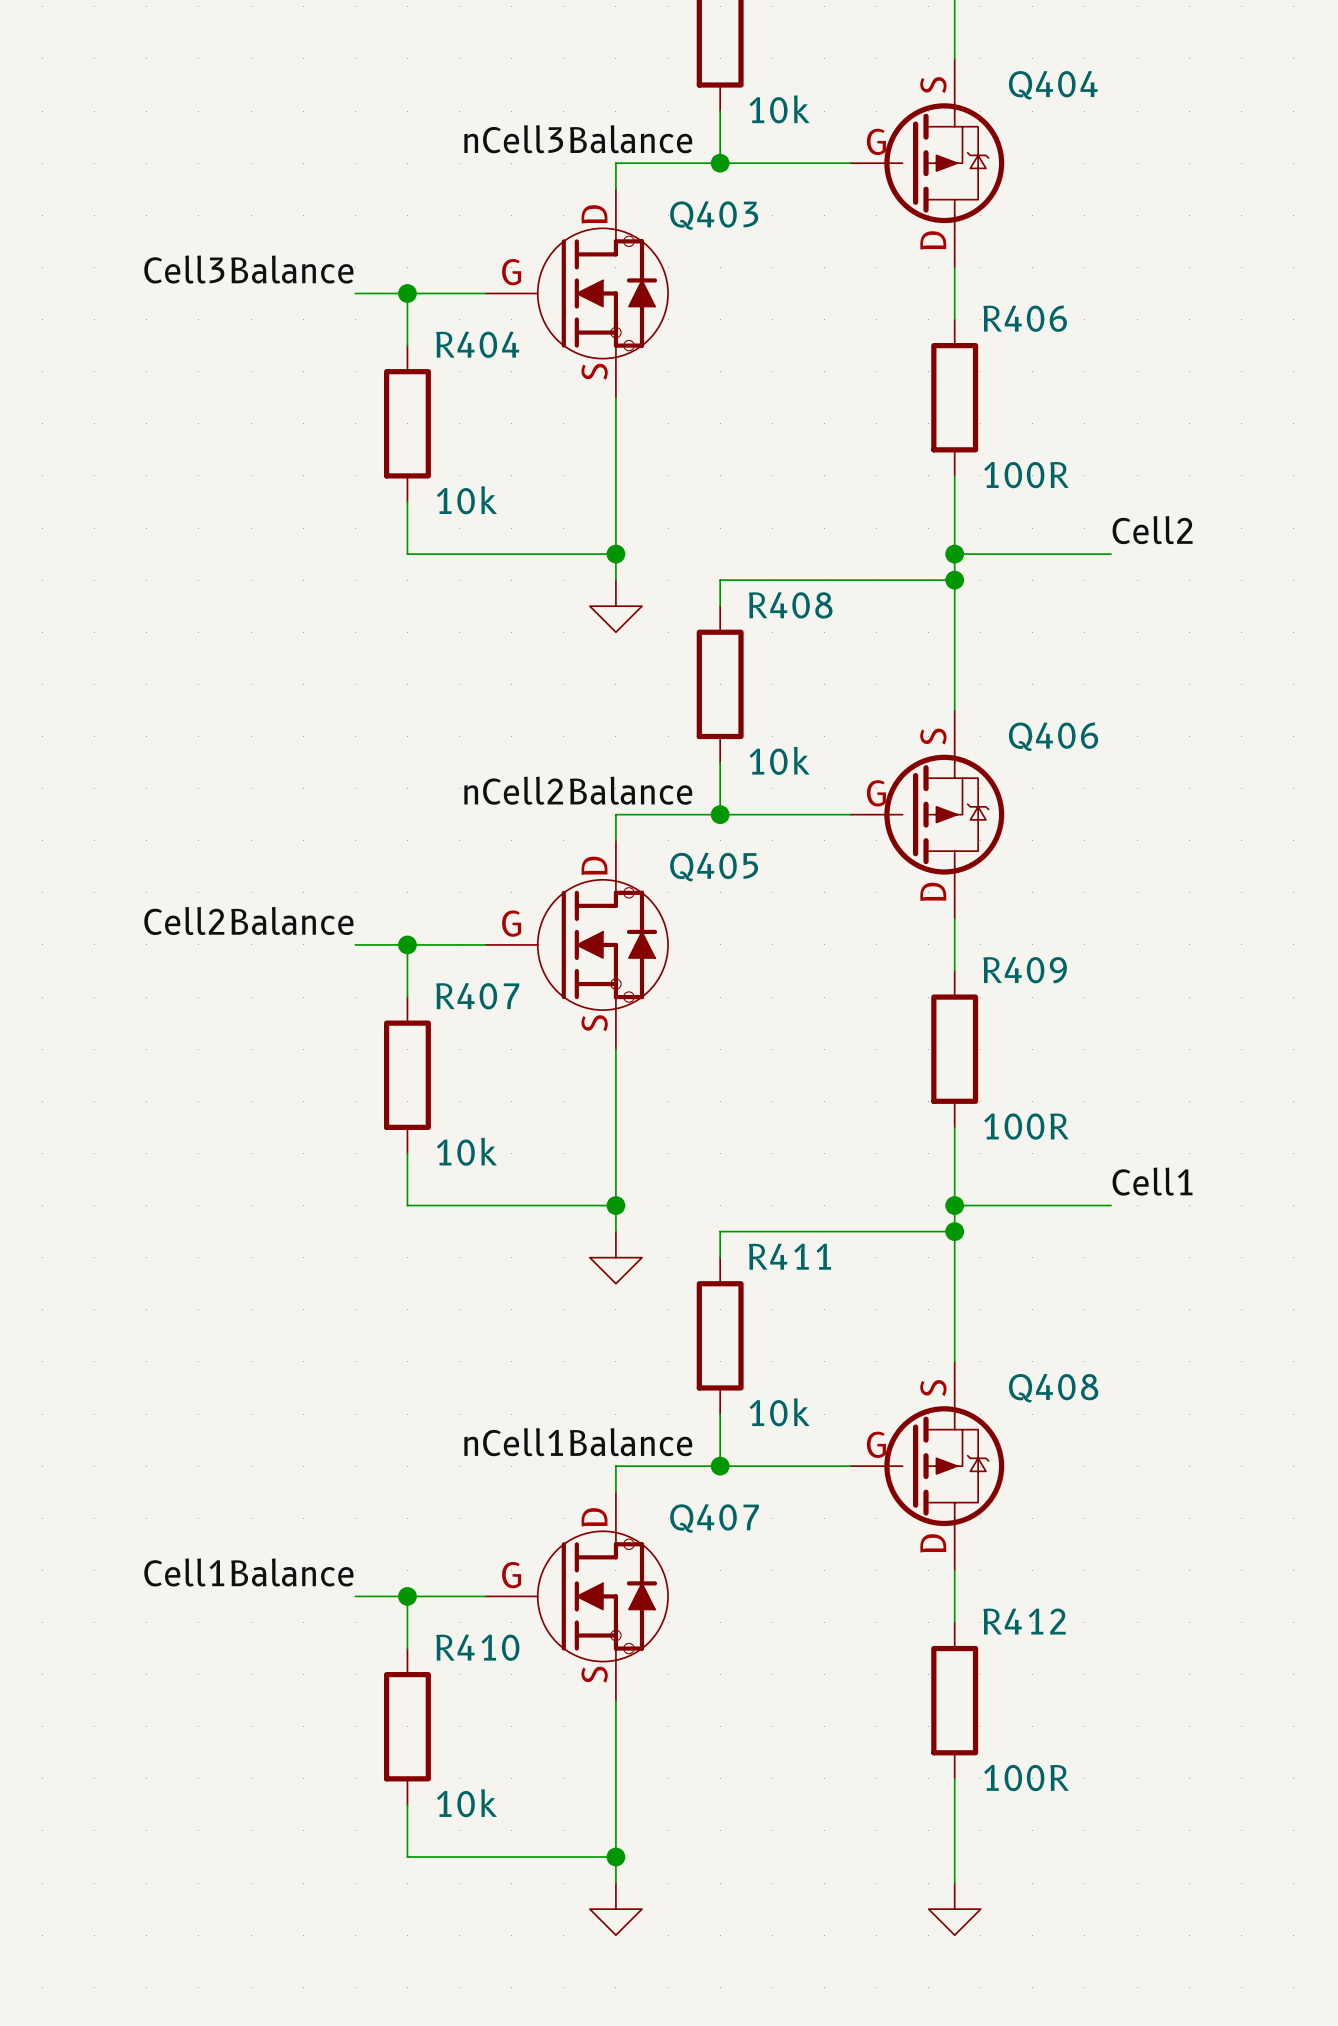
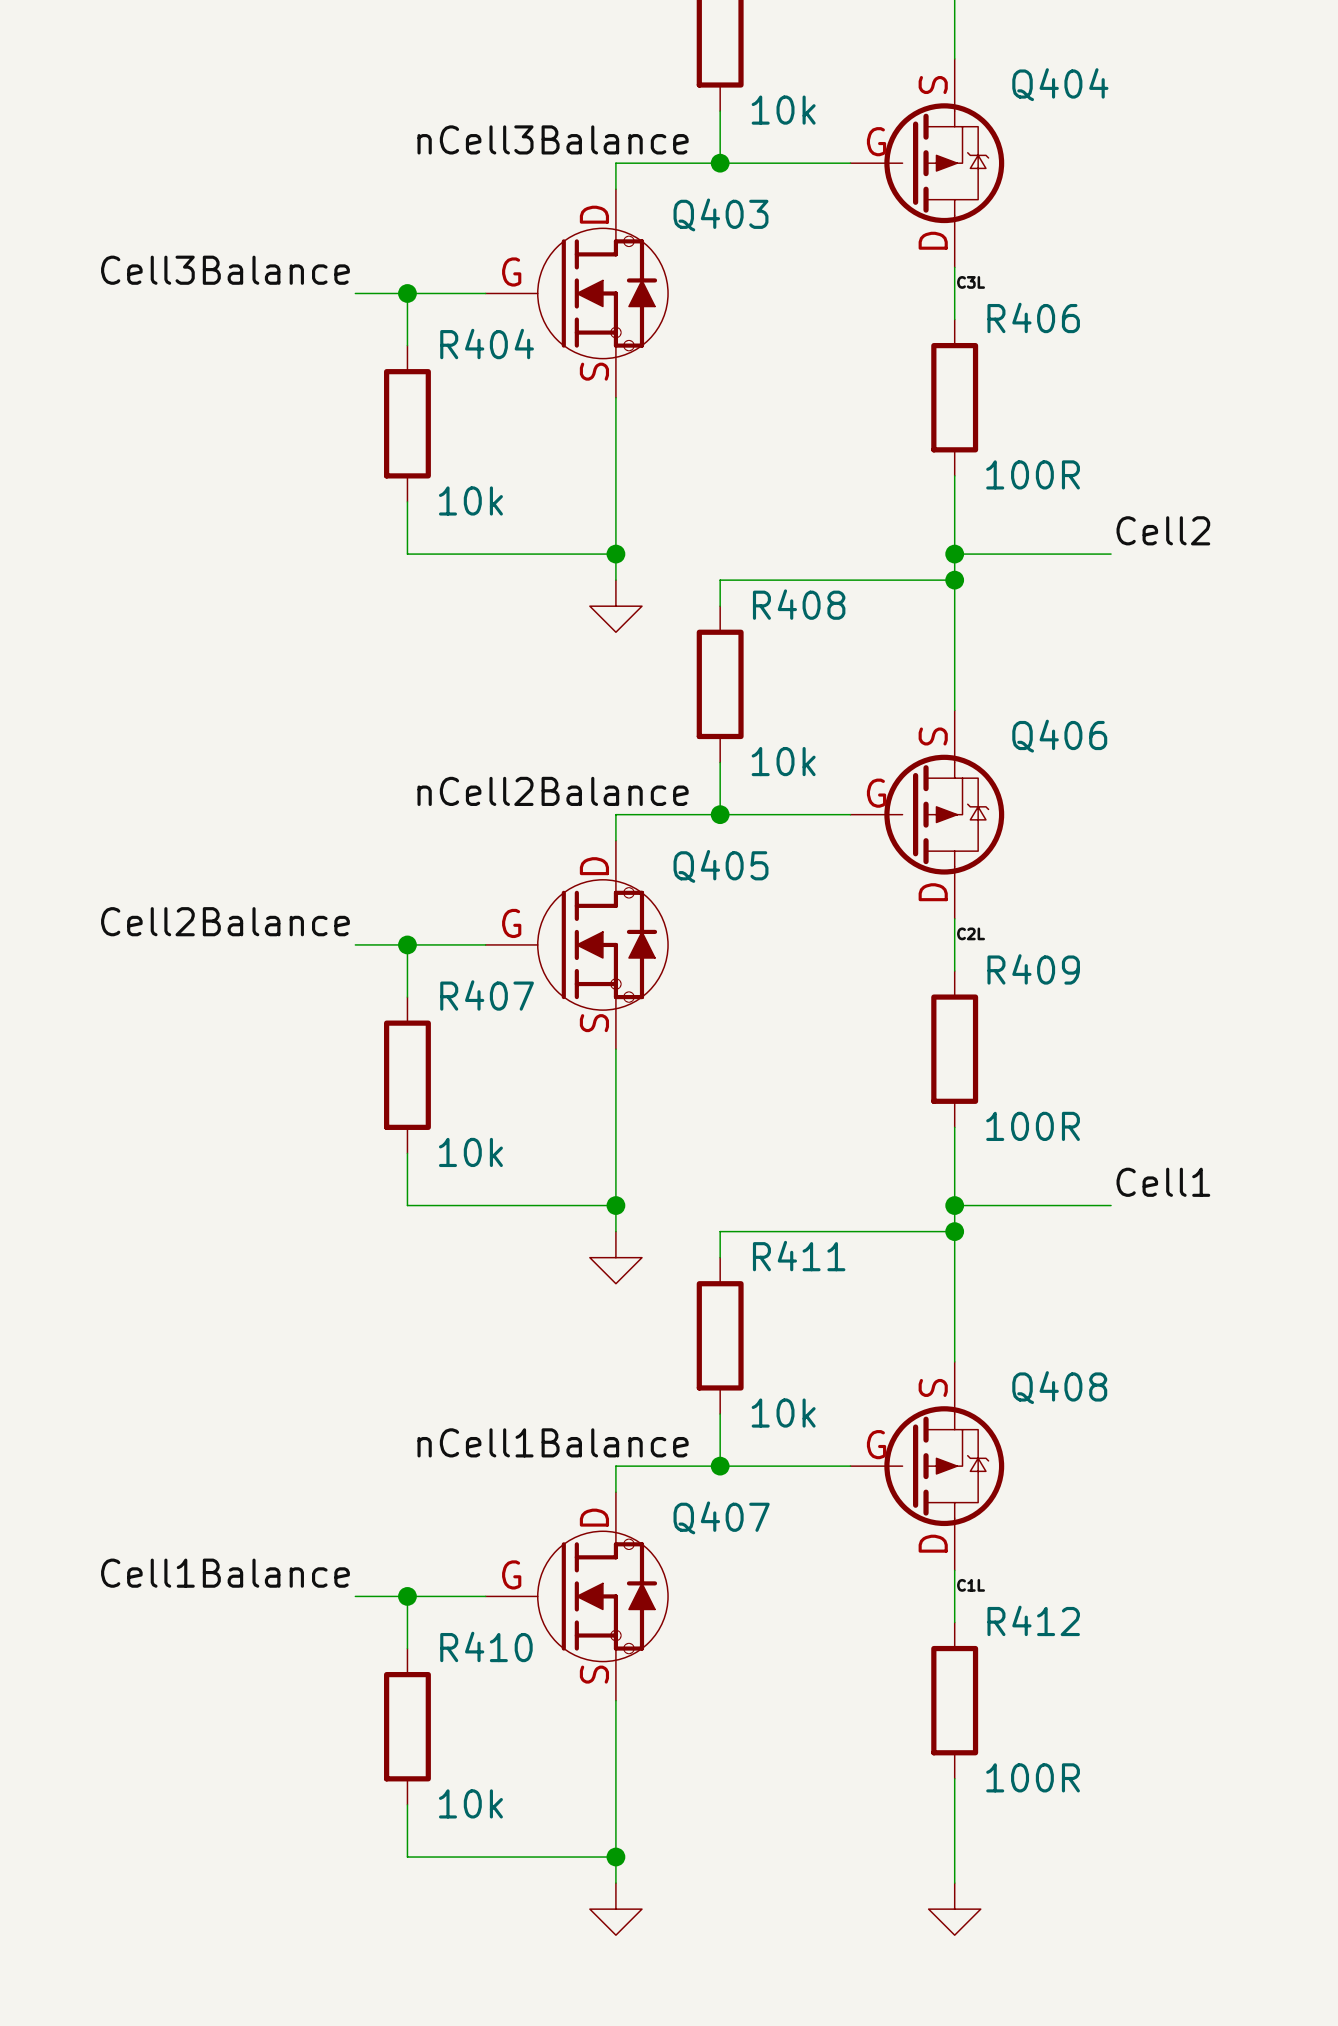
label: none -> C3L (971, 282)
label: none -> C2L (971, 933)
label: none -> C1L (971, 1585)

